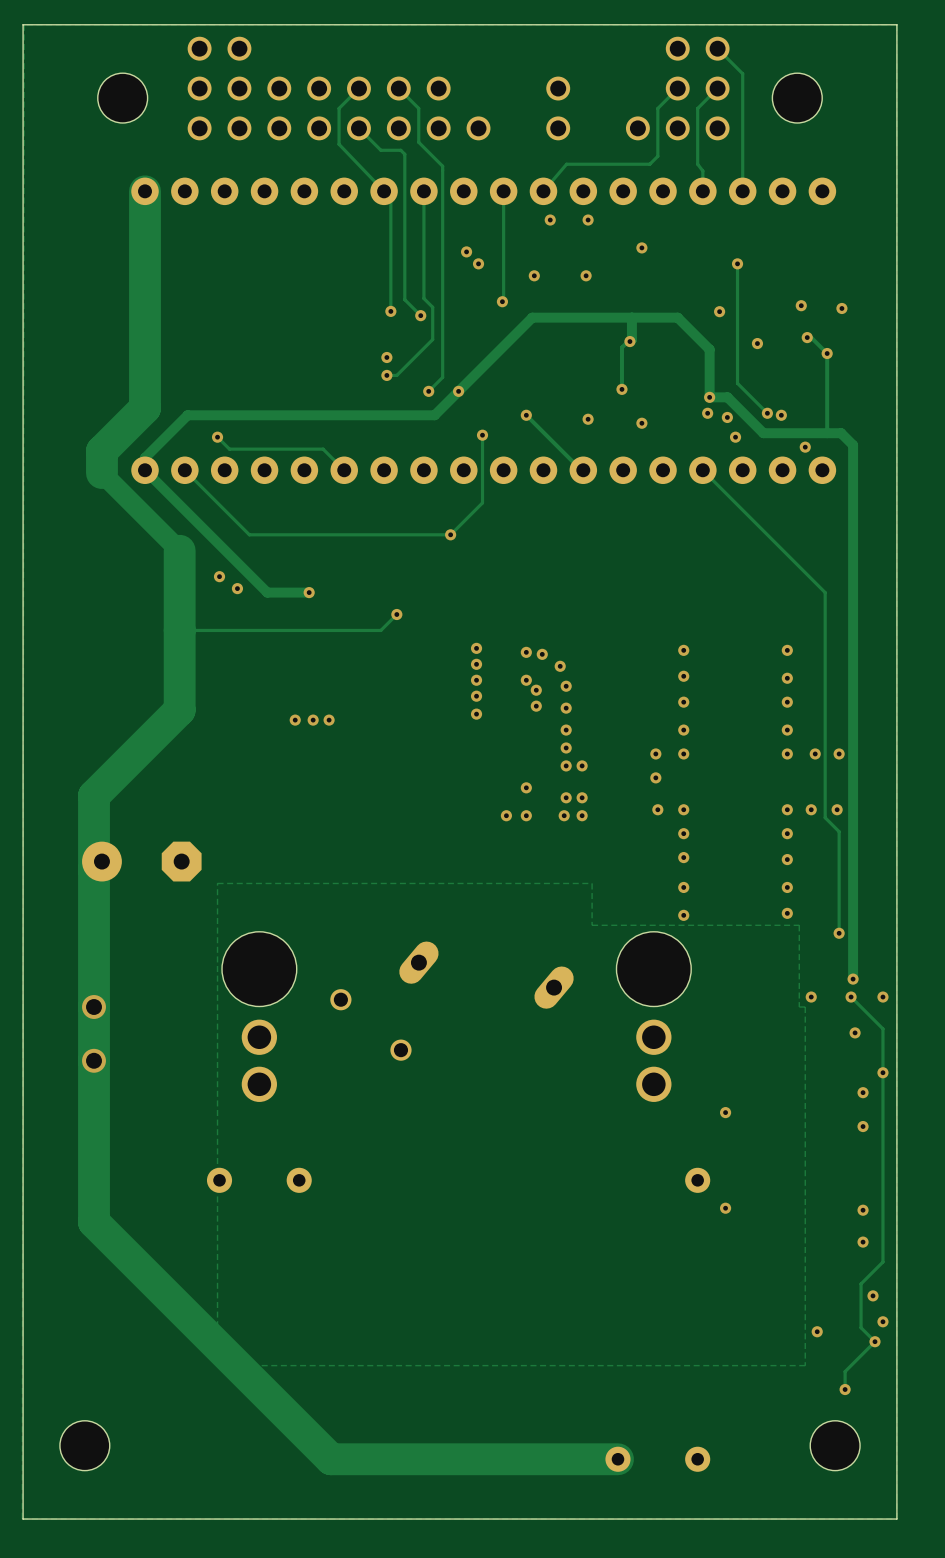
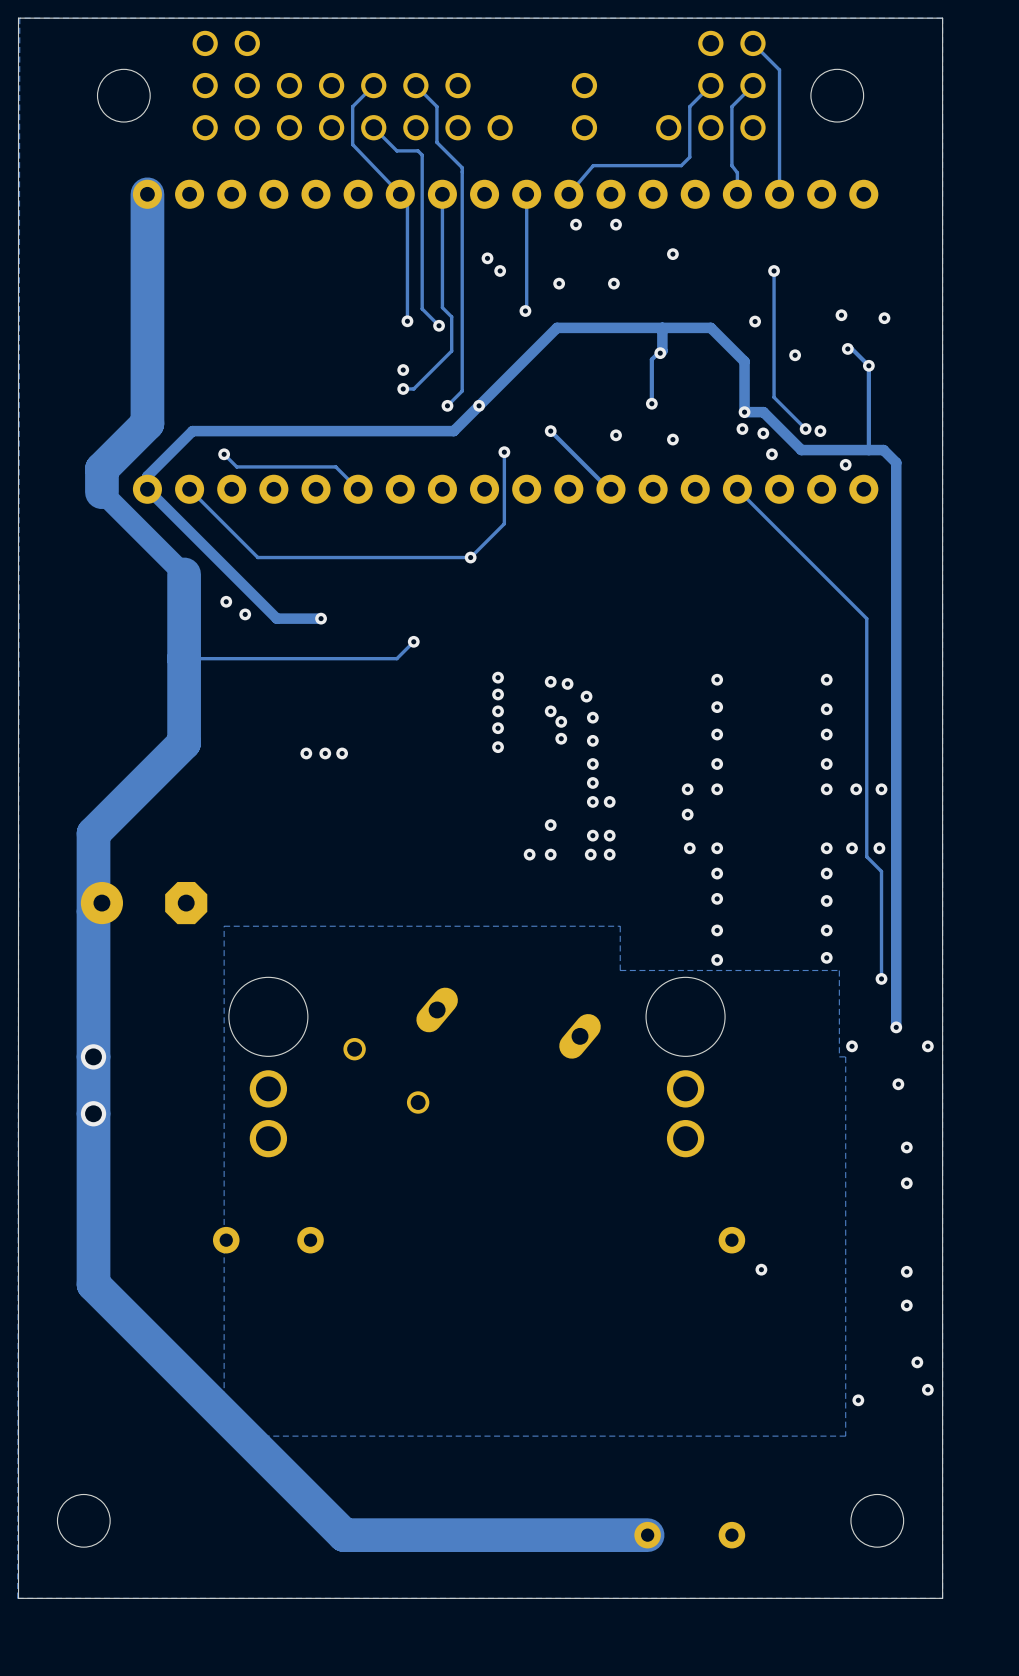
track: (851, 997) (882, 1028) (882, 1262) (861, 1283) (861, 1327) (875, 1341) (845, 1371) (845, 1389) -> none
via: (851, 997) -> none
via: (882, 1072) -> none
via: (725, 1112) -> none
via: (875, 1341) -> none
via: (845, 1389) -> none

